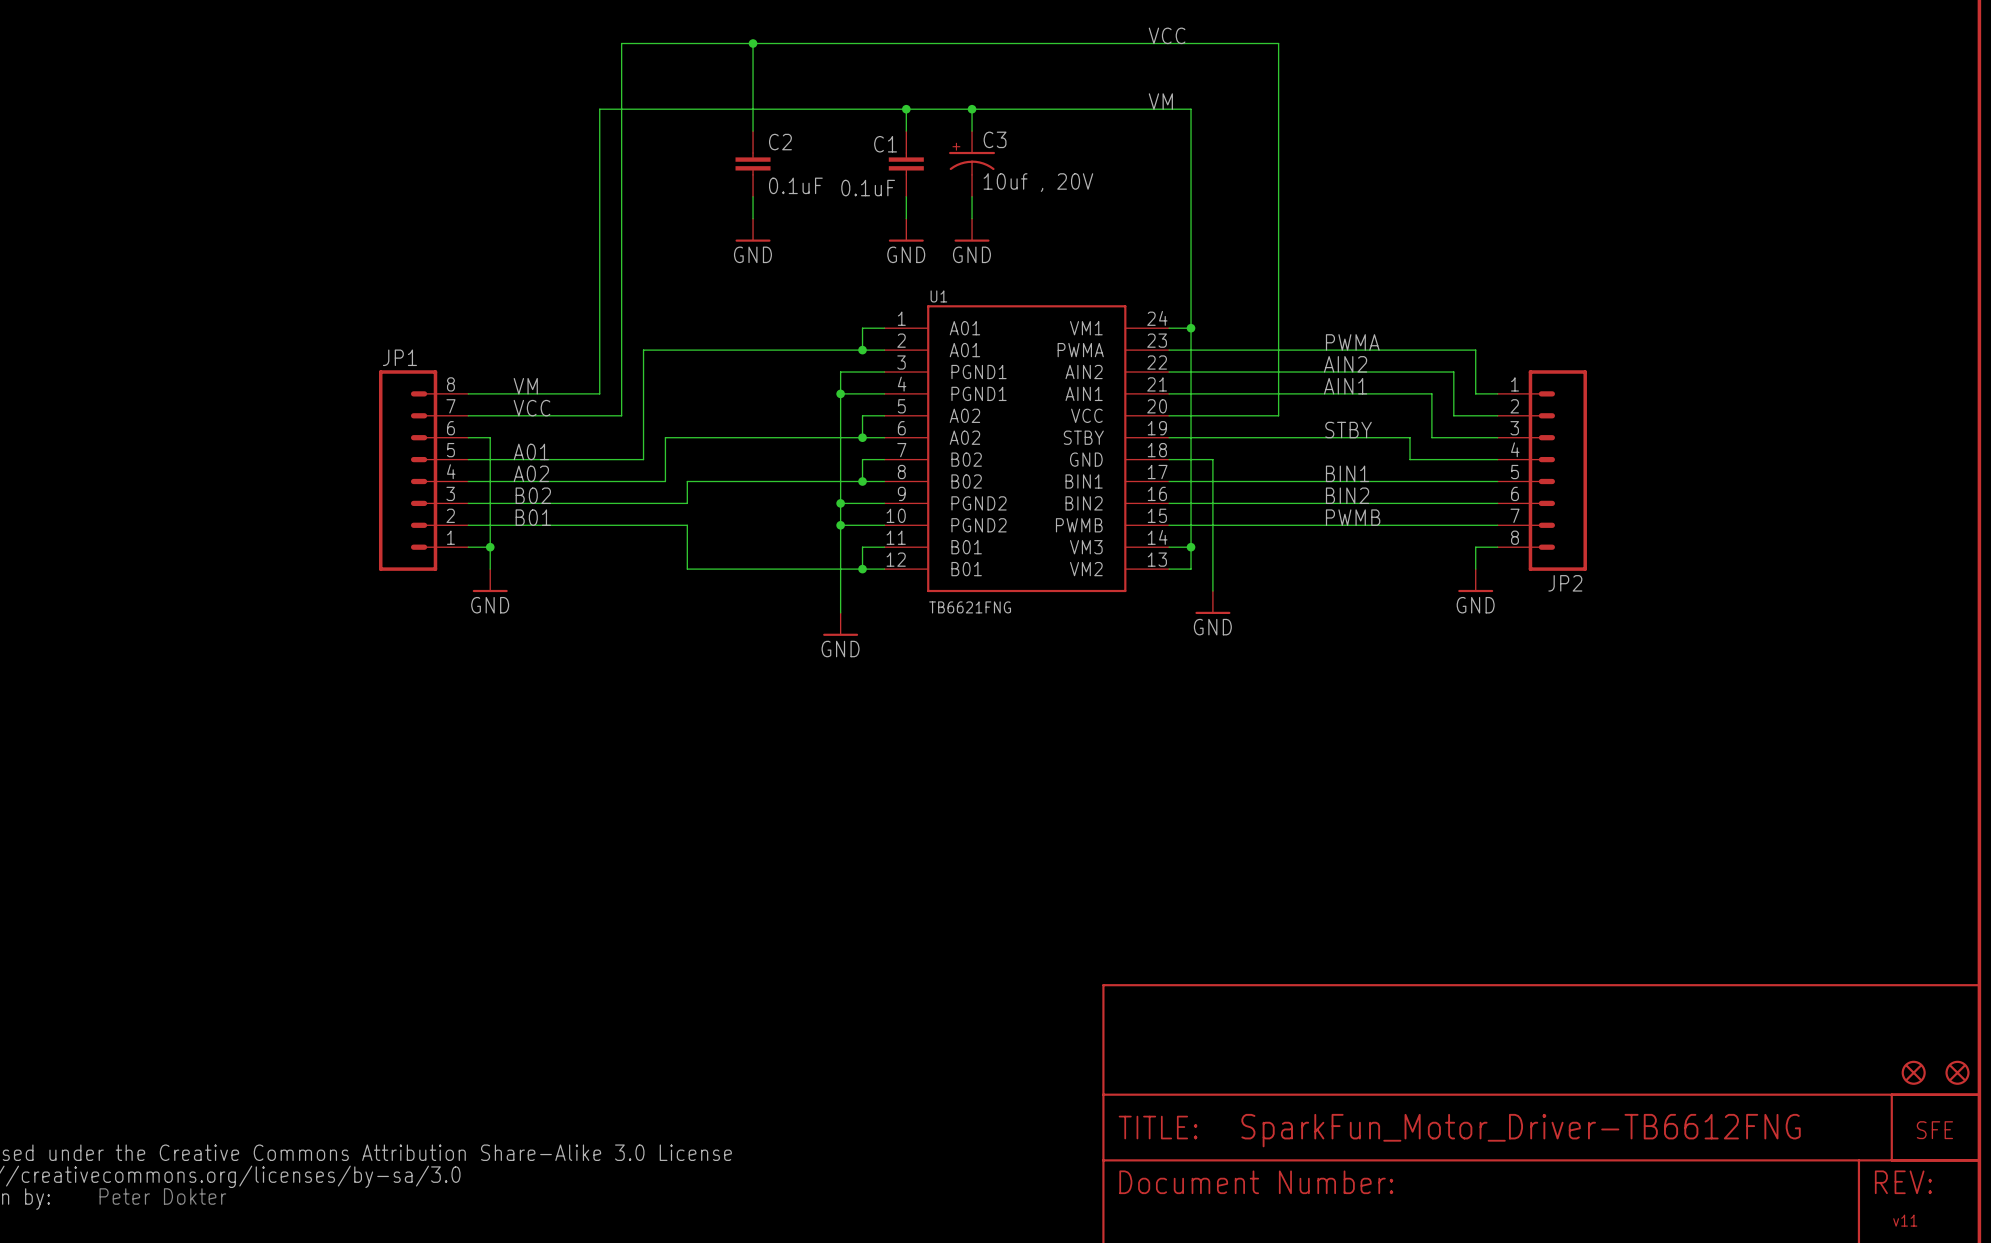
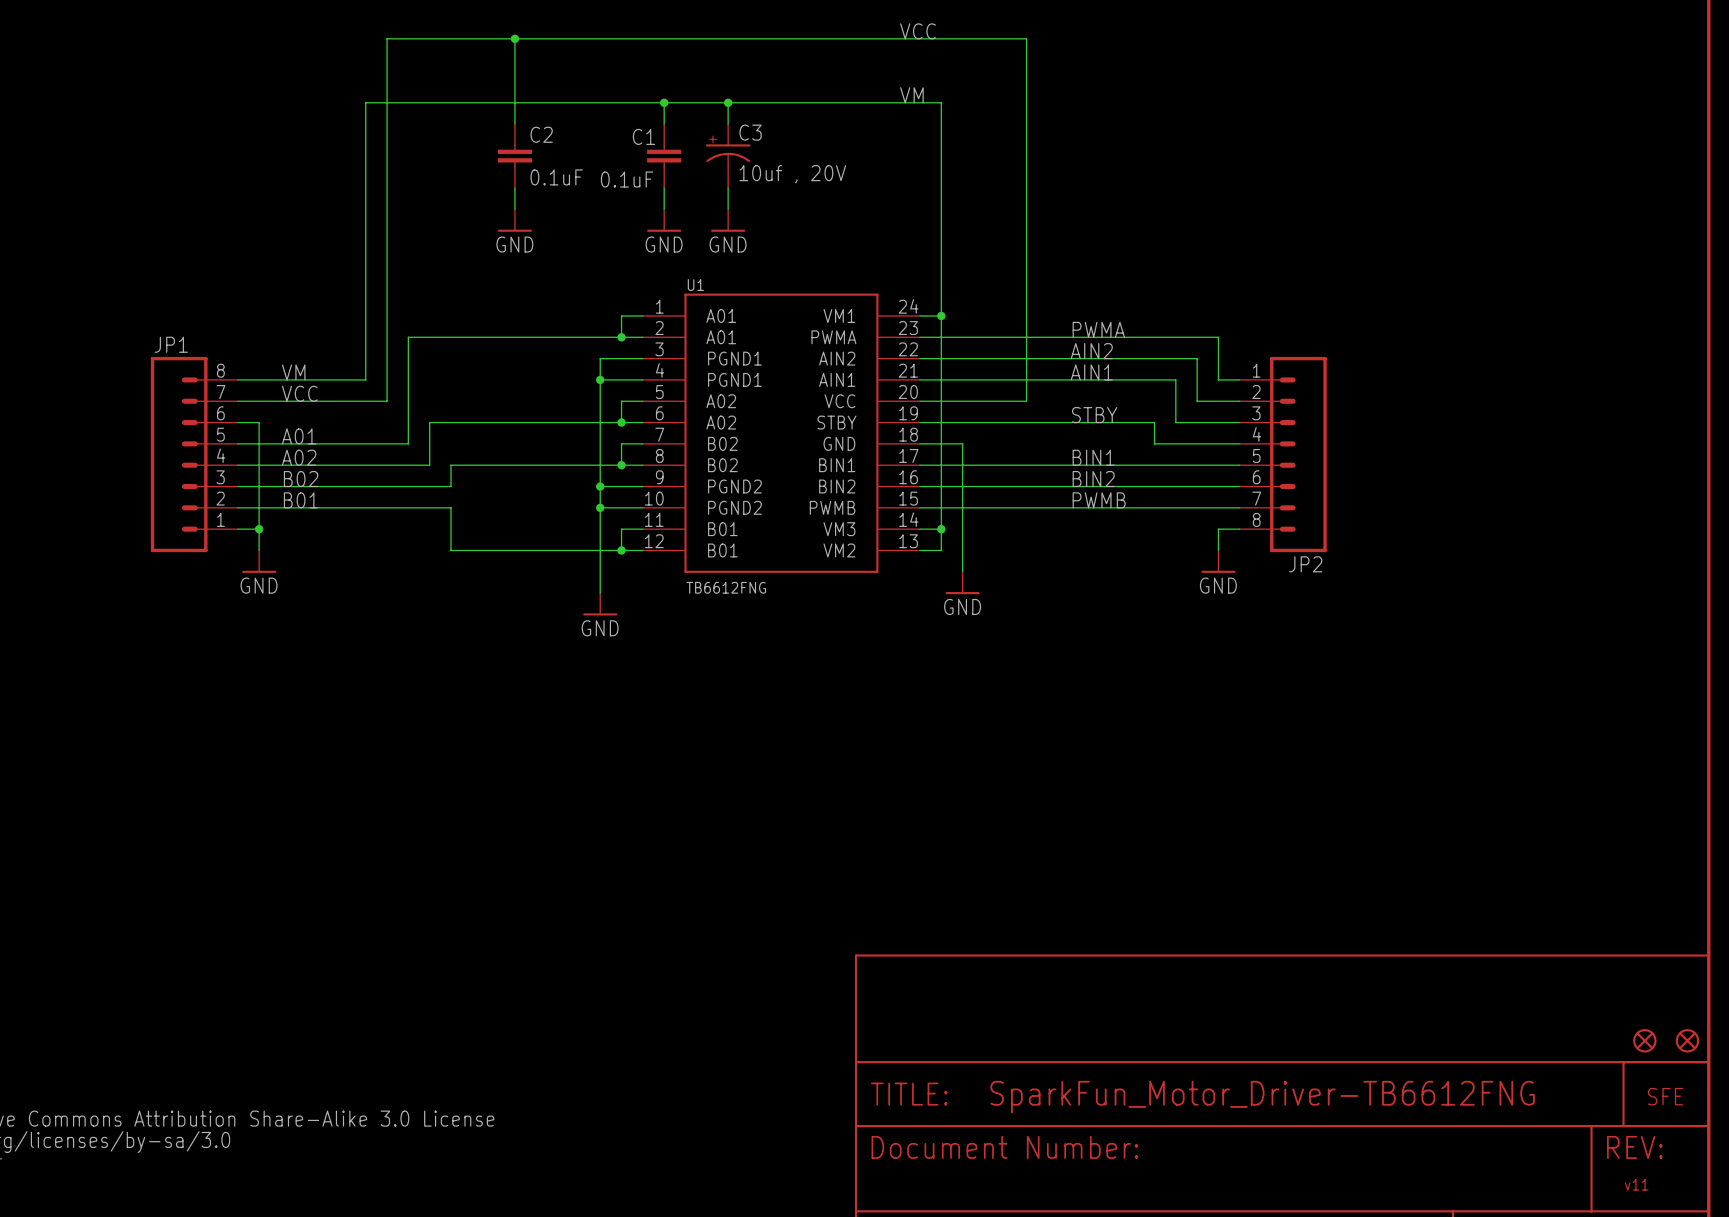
U1 value: TB6621FNG (970, 607) -> TB6612FNG (726, 587)

